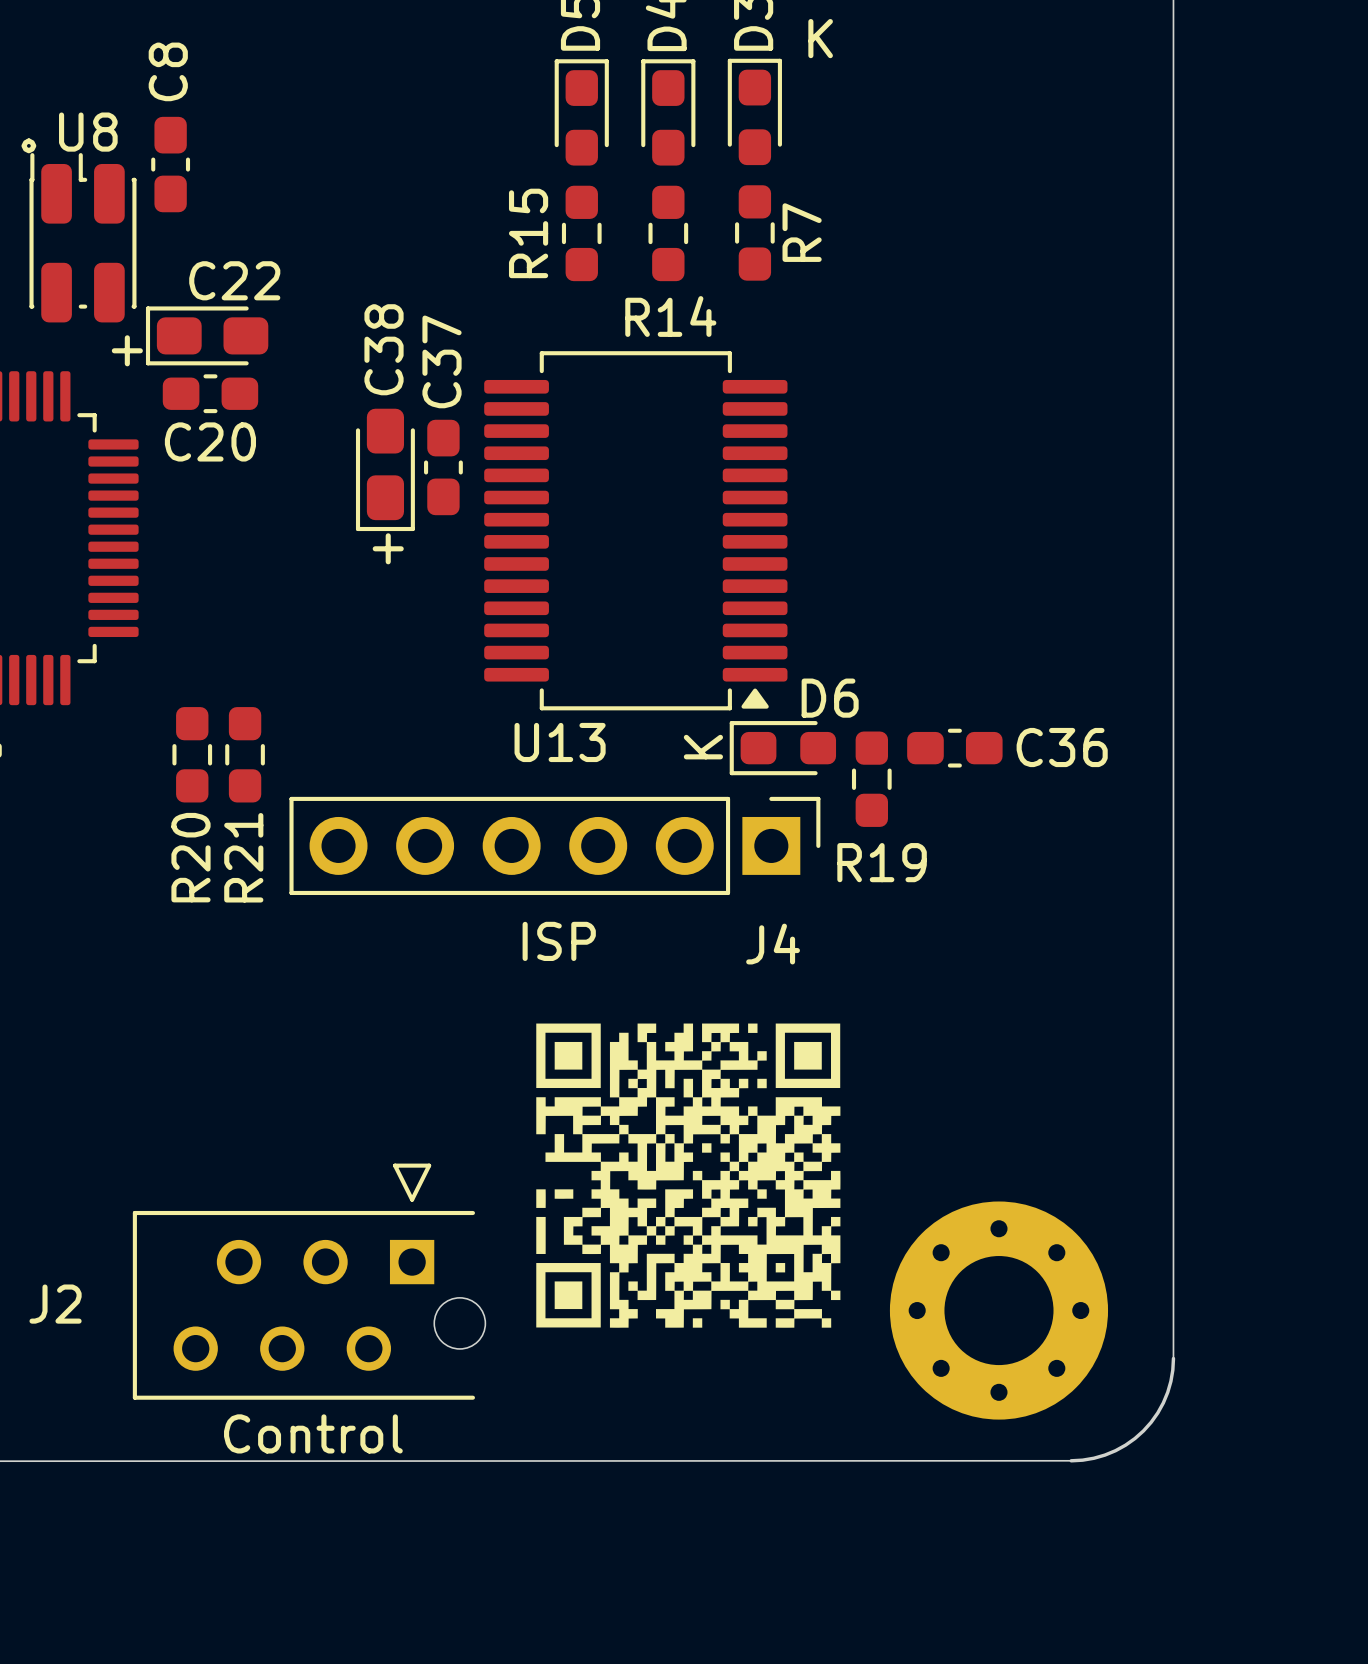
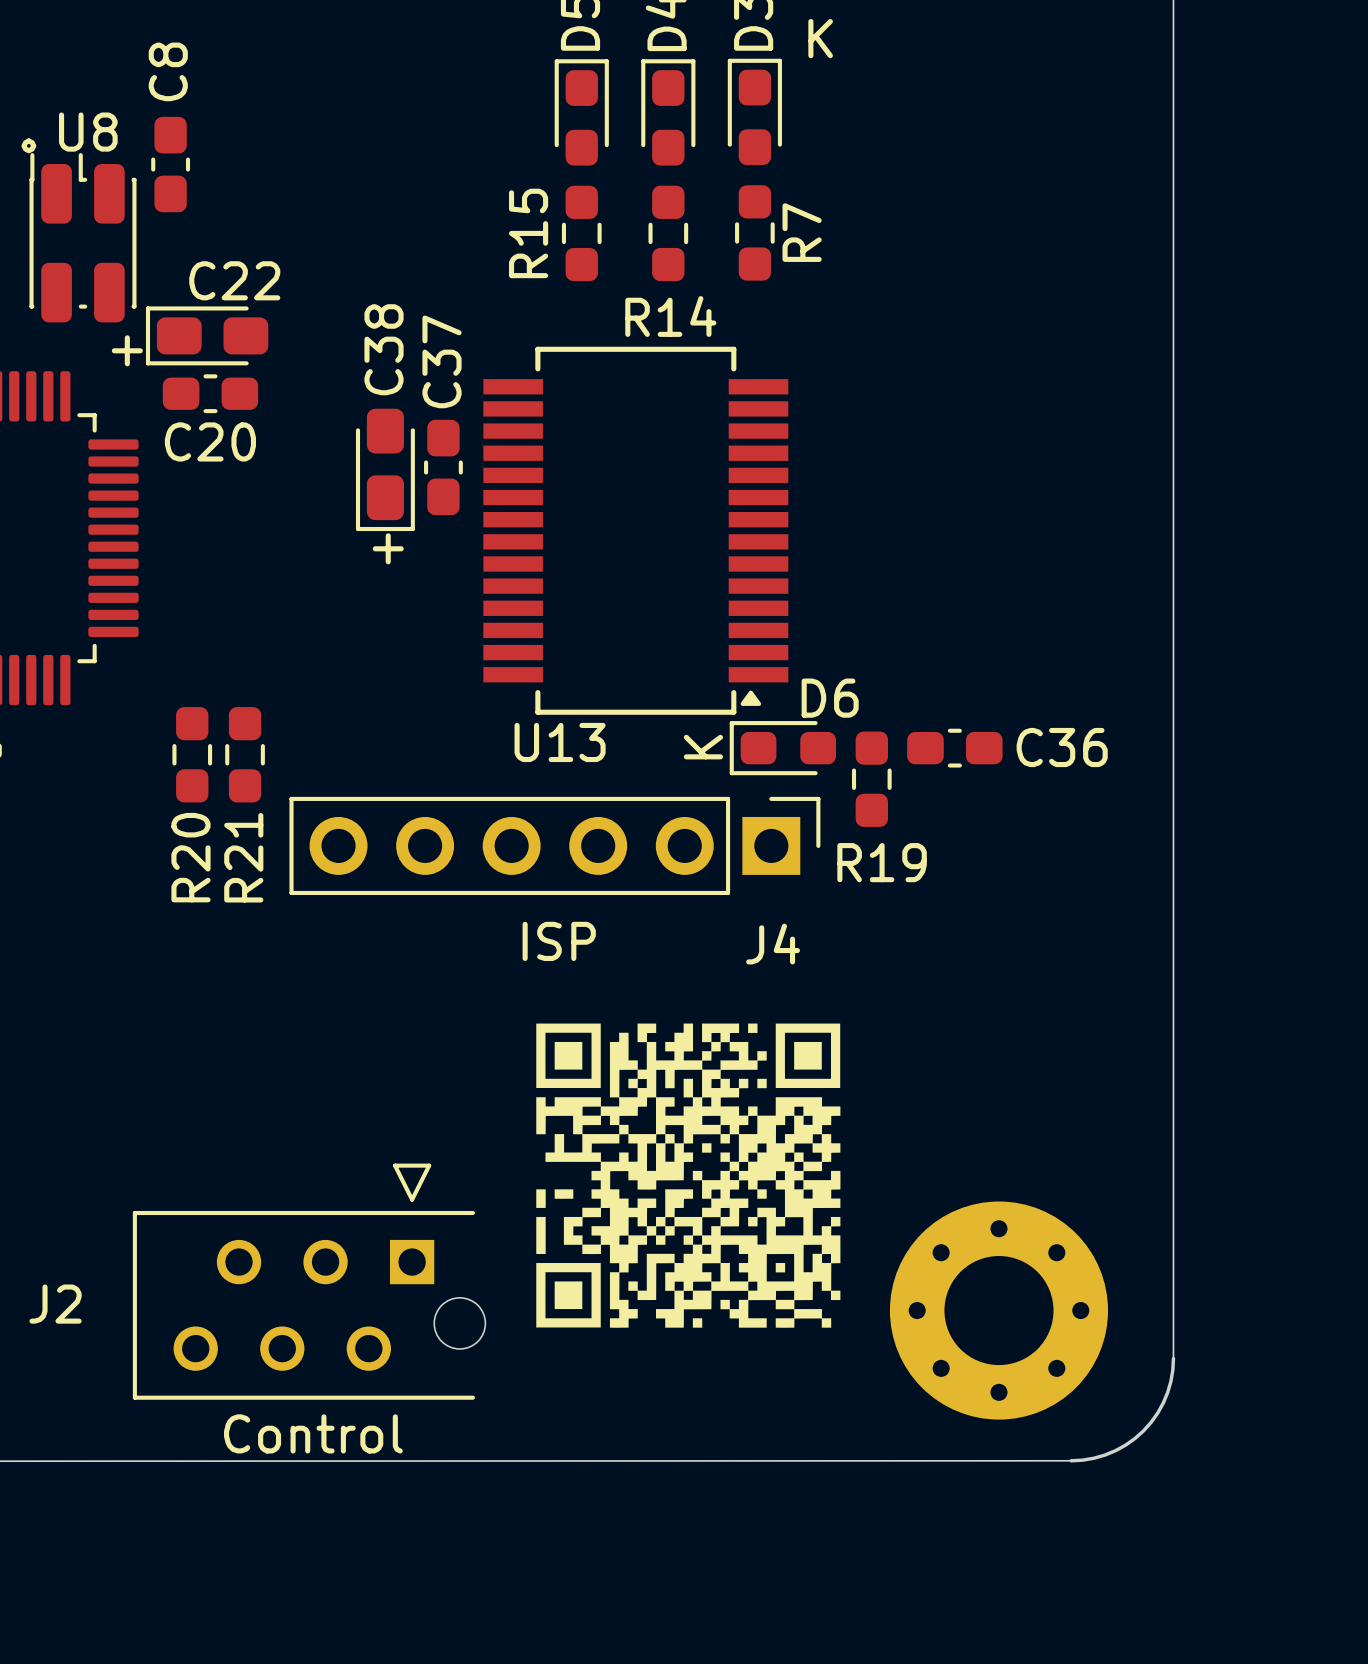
U13 footprint: [484, 351, 788, 711] -> [483, 346, 789, 715]

